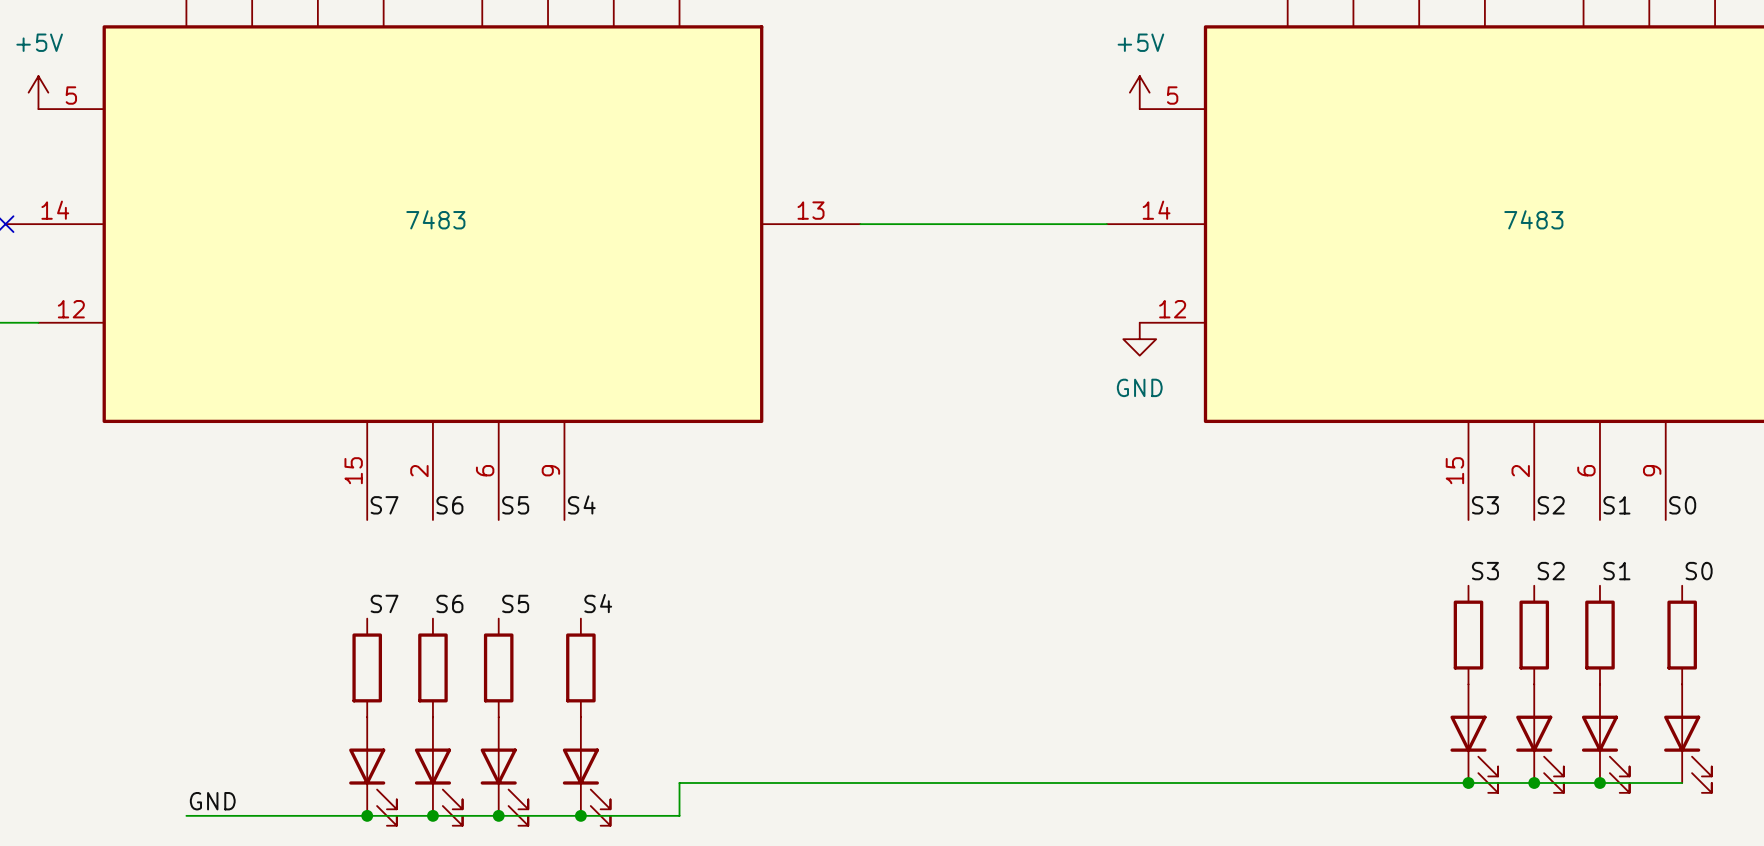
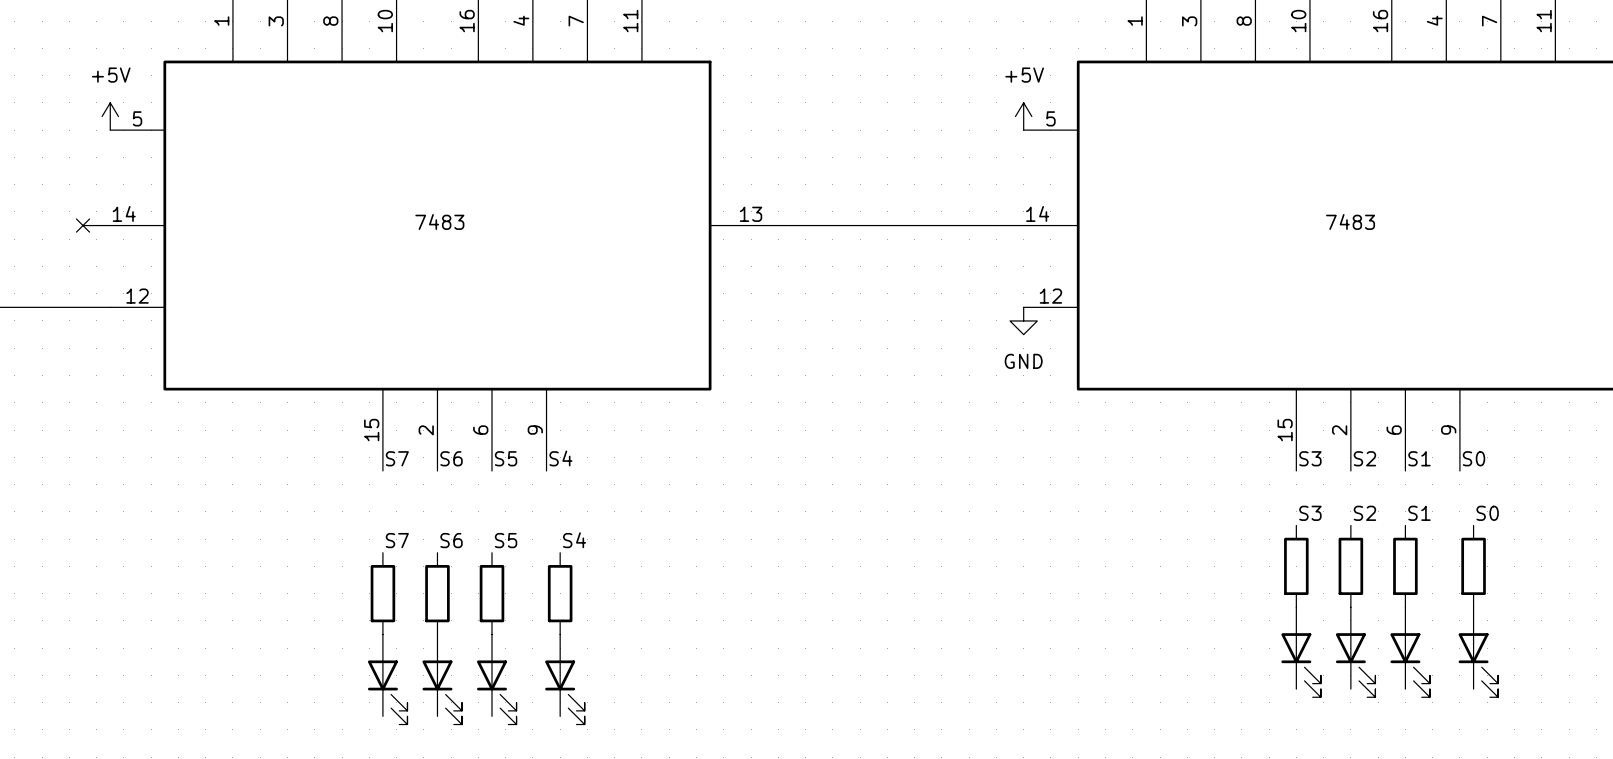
junction: (1468, 782) -> none
junction: (1534, 782) -> none
junction: (1599, 782) -> none
wire: (1682, 782) (679, 782) (679, 815) (186, 815) -> none
label: GND (212, 801) -> none
junction: (367, 815) -> none
junction: (432, 815) -> none
junction: (498, 815) -> none
junction: (580, 815) -> none

